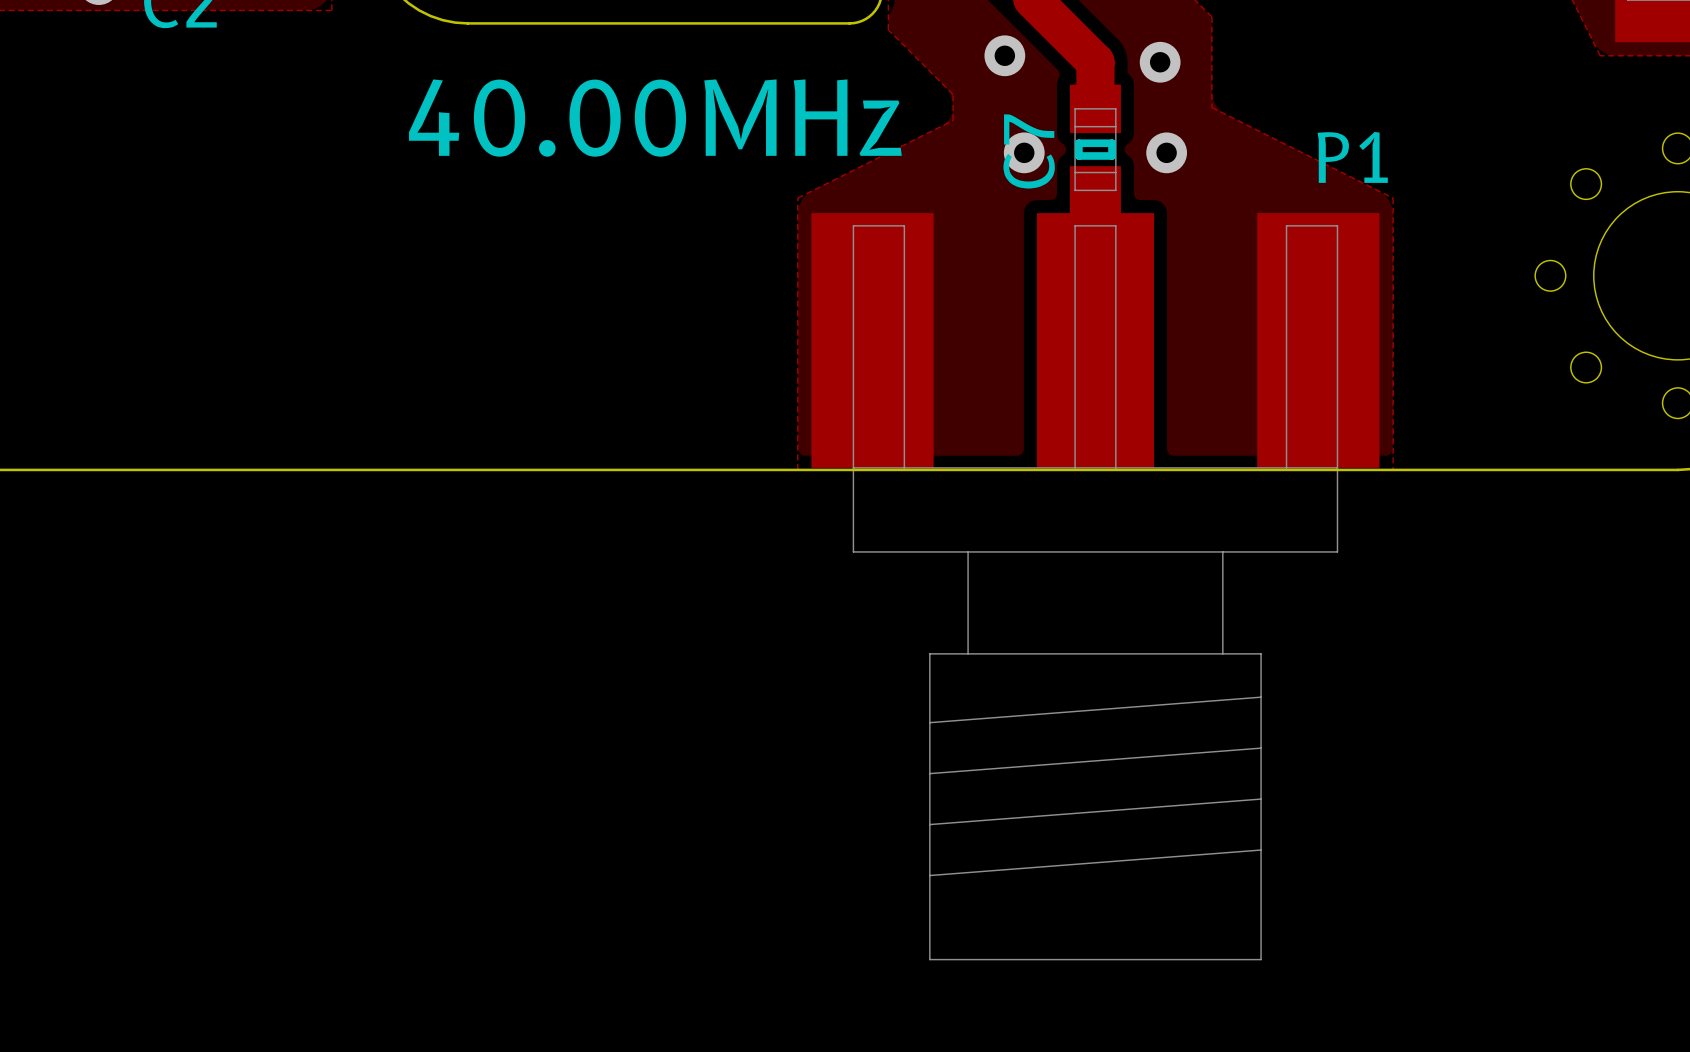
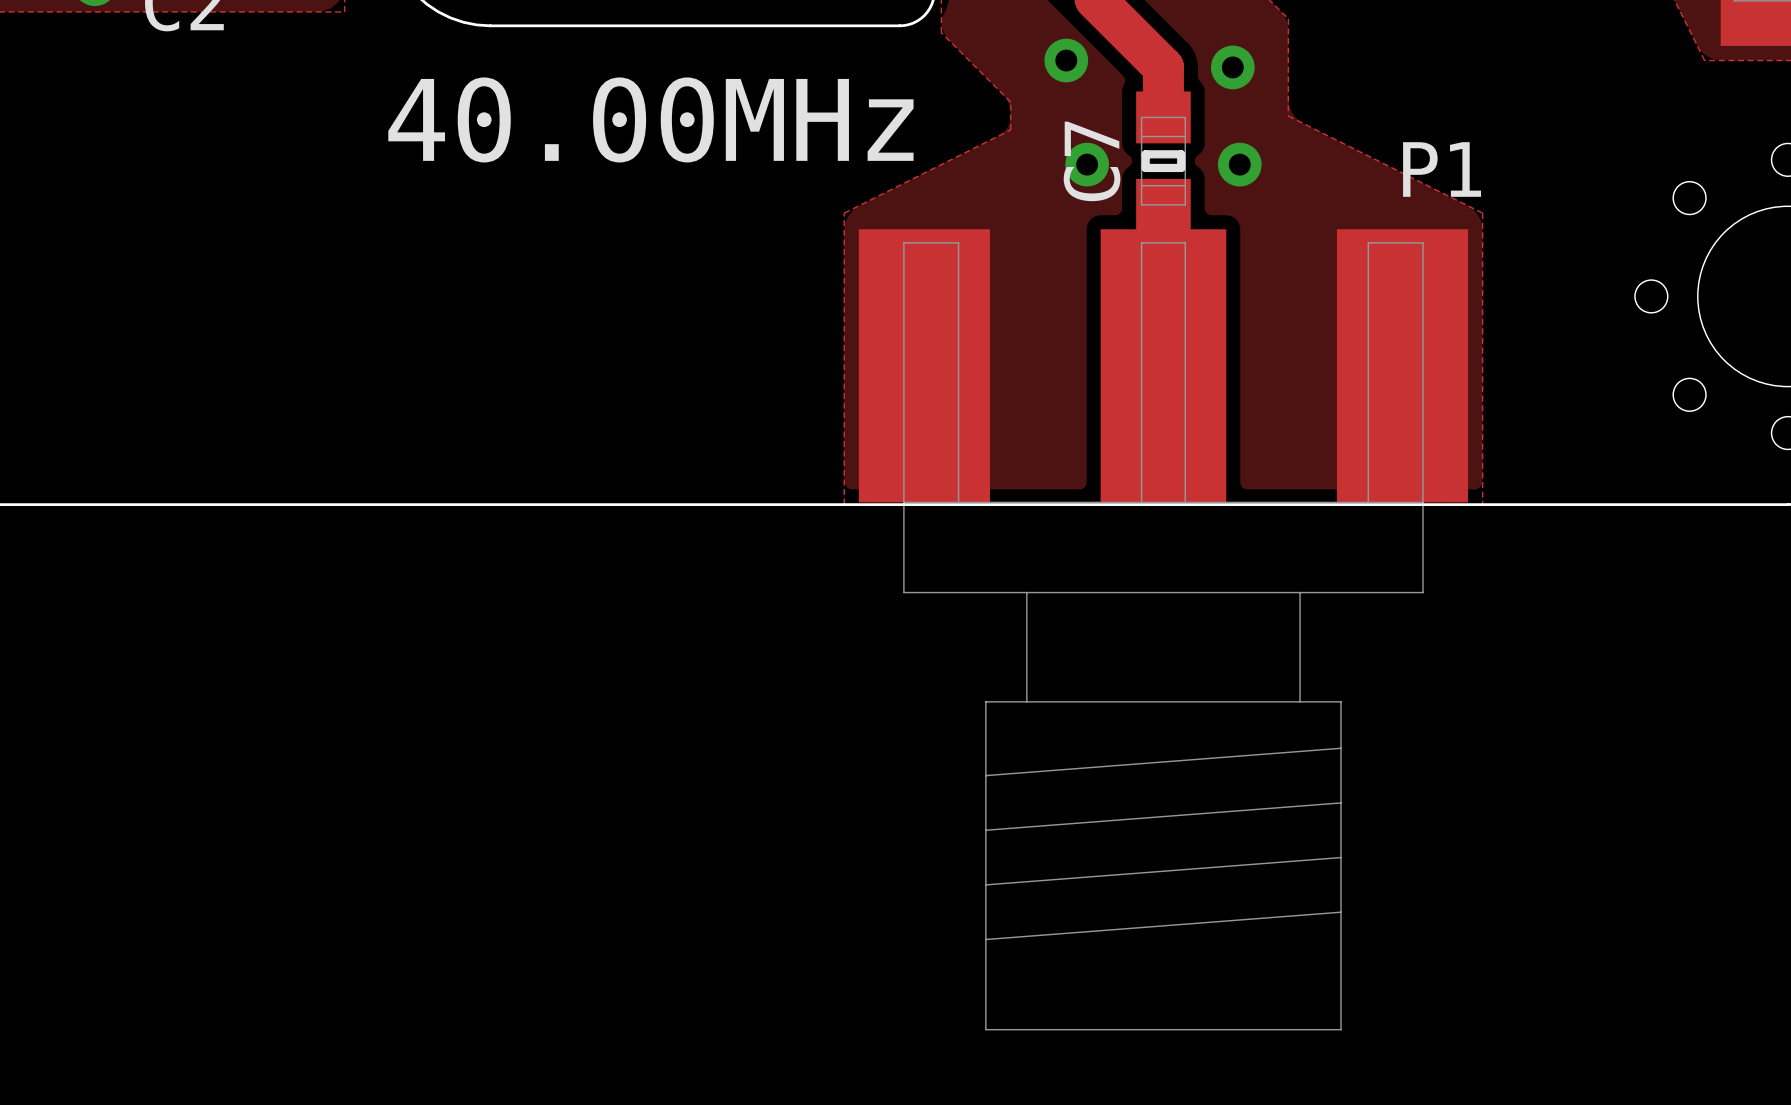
text position: 40.00MHz (655, 118) -> 40.00MHz (650, 119)

